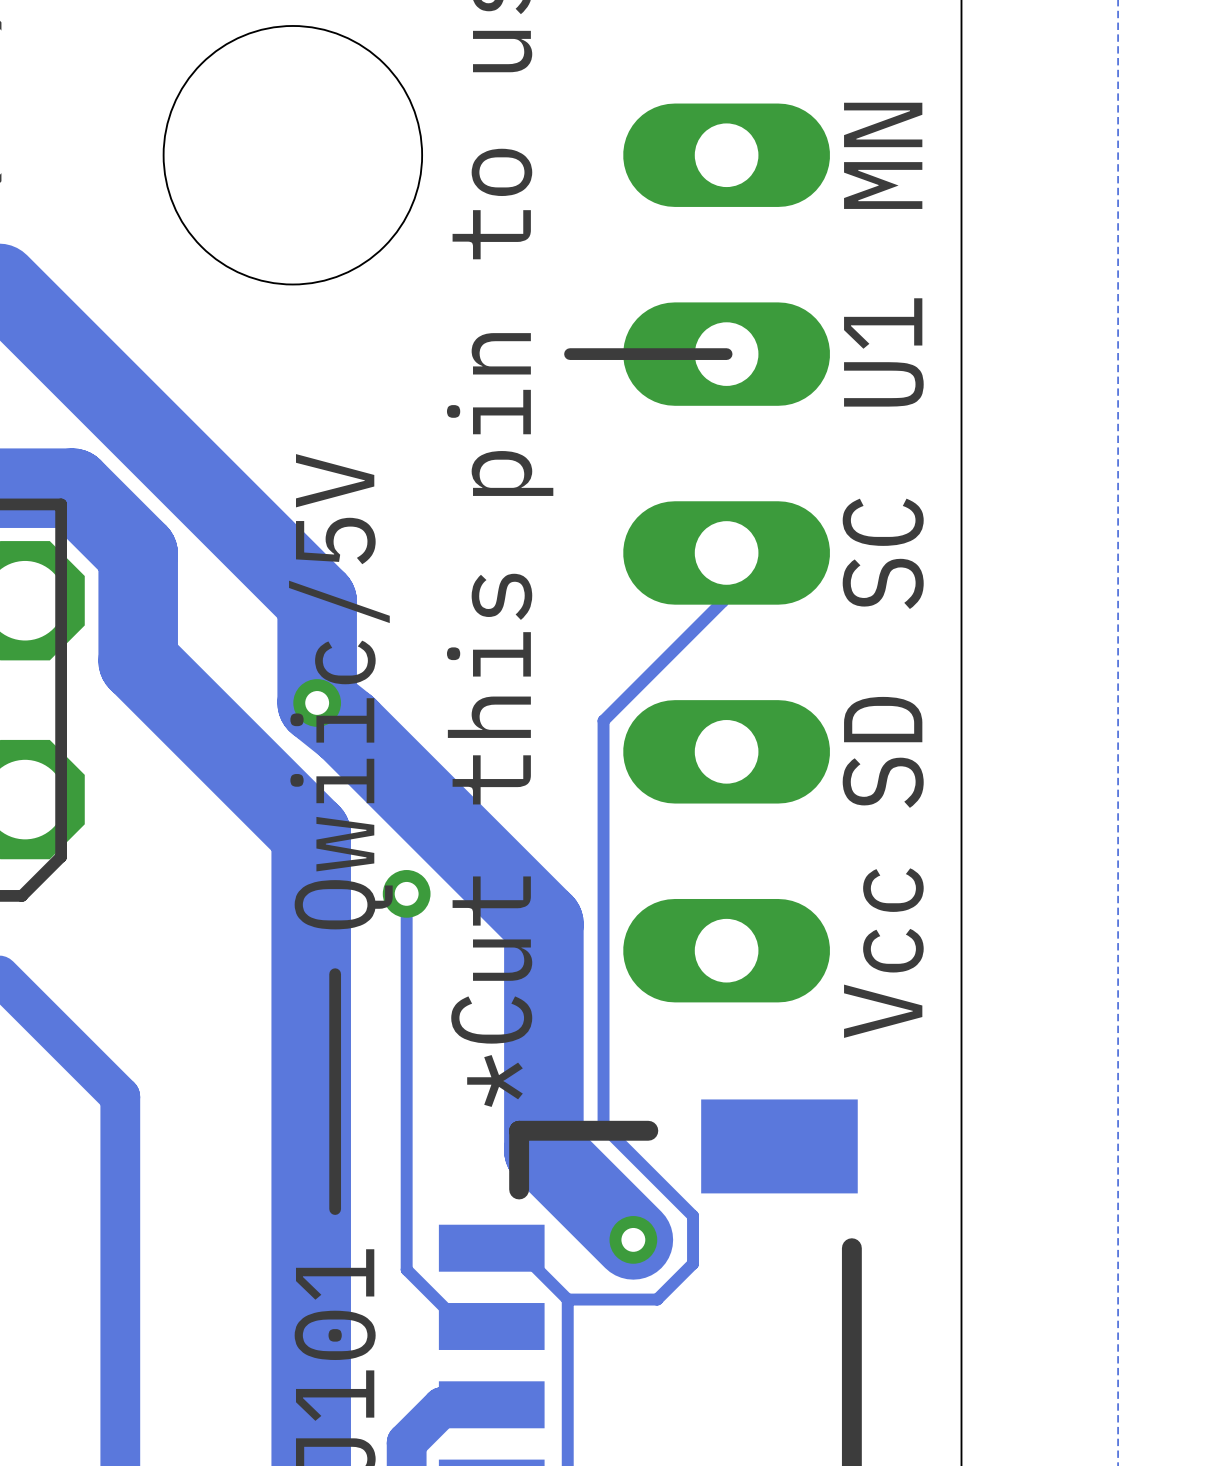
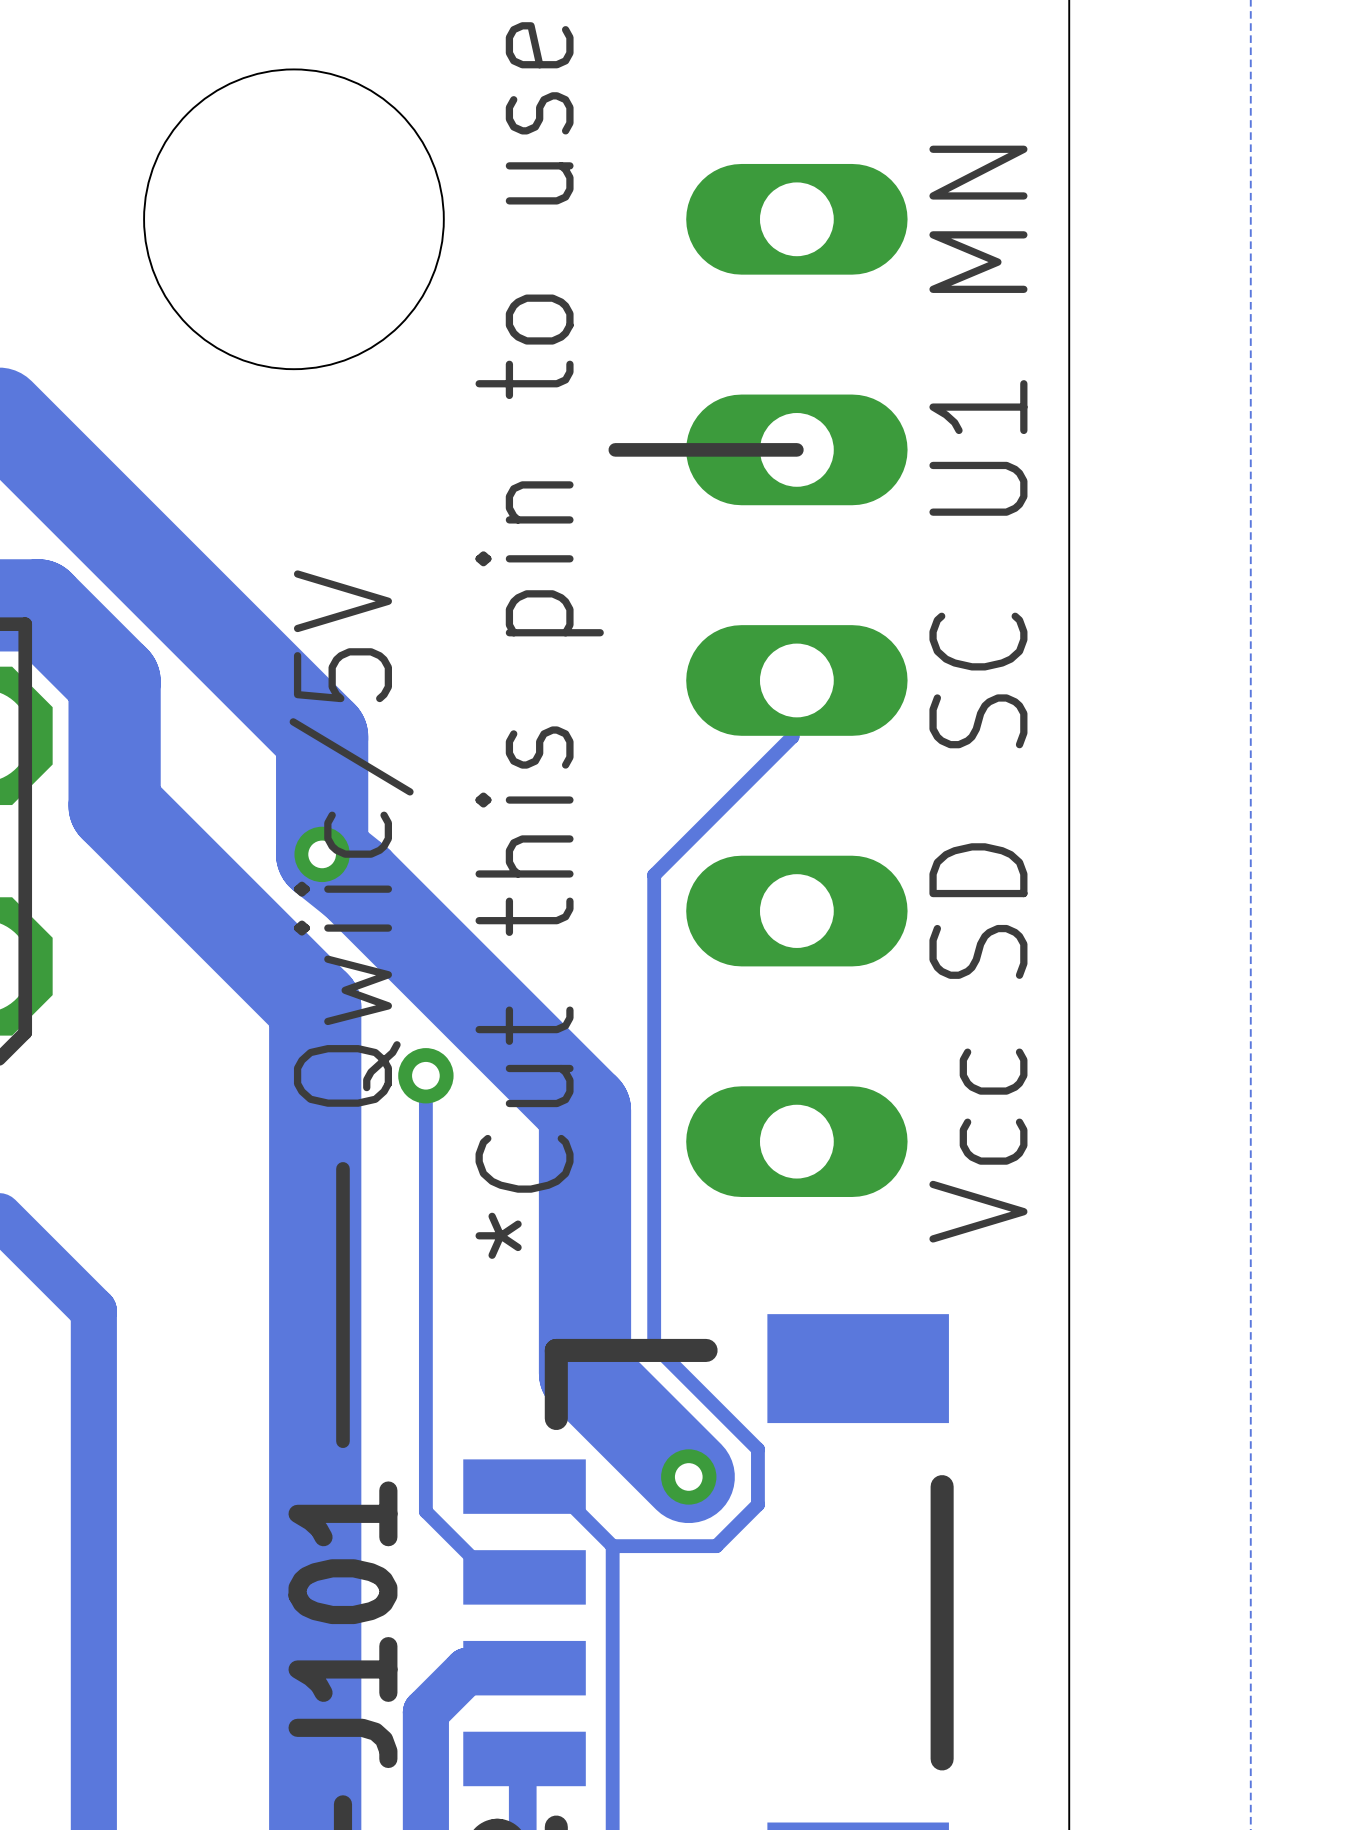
part footprint: [623, 103, 831, 1003] -> [686, 163, 908, 1197]

